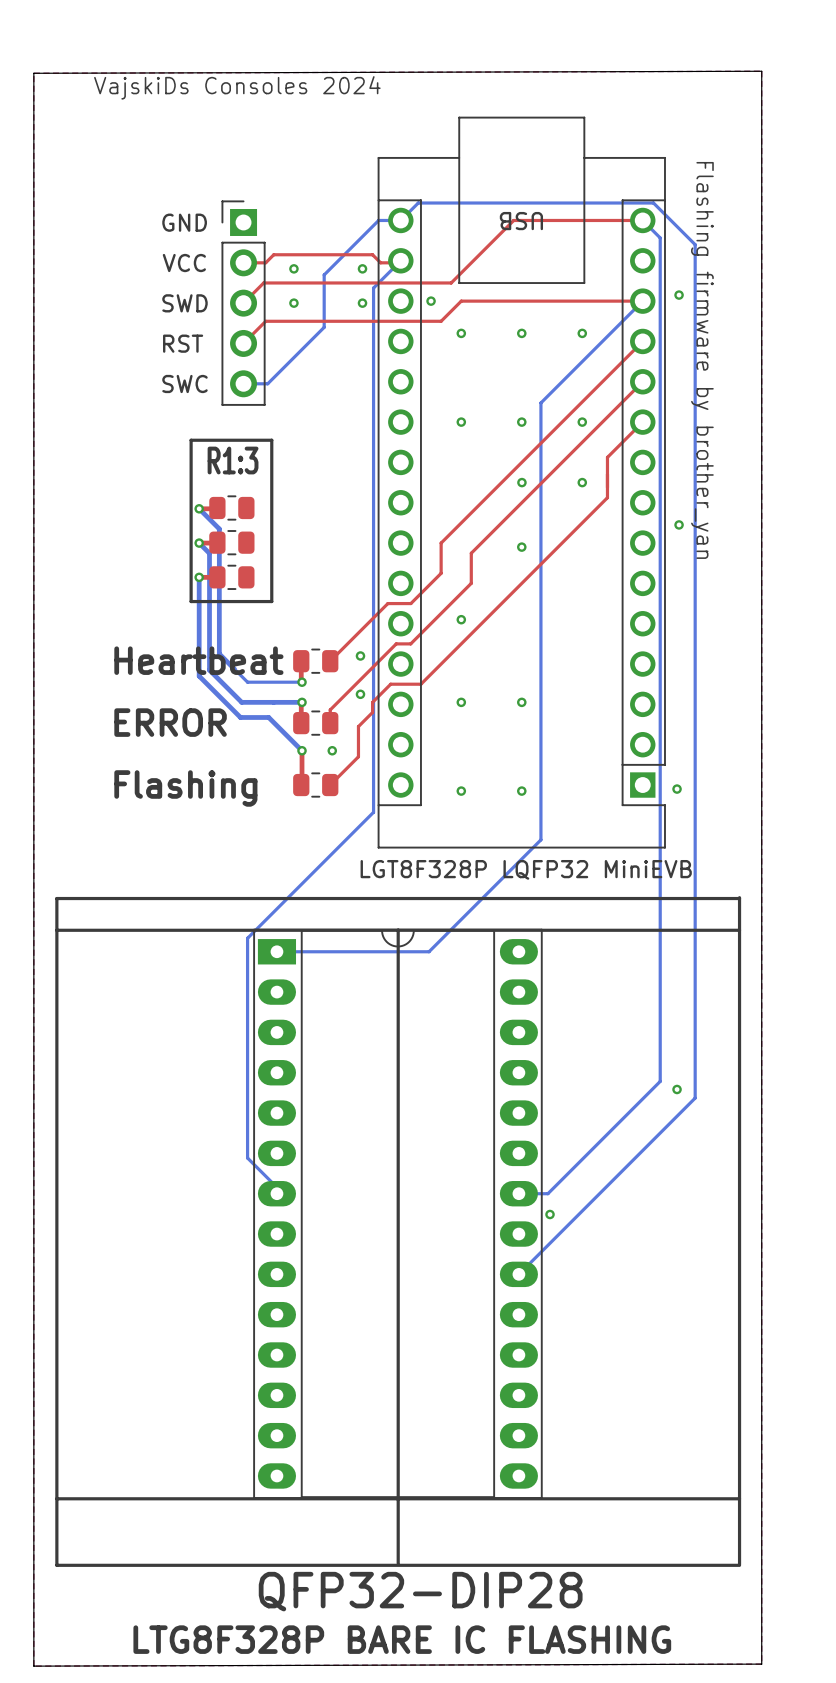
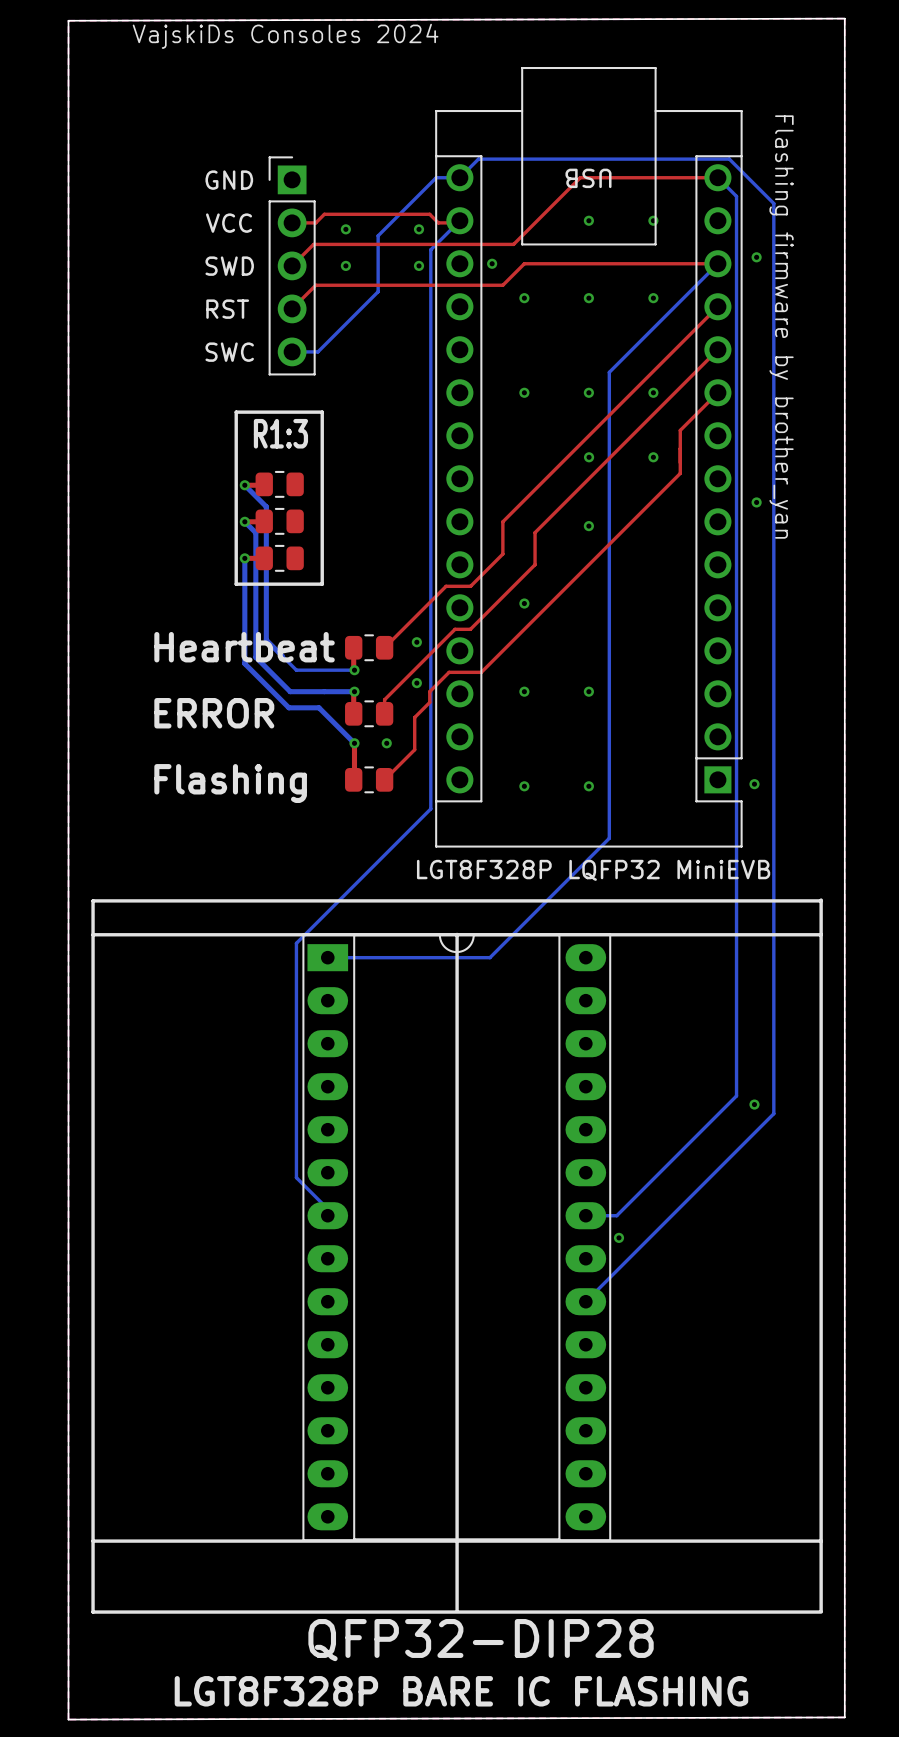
via: none -> (588, 220)
via: none -> (653, 220)
text: LTG8F328P BARE IC FLASHING (402, 1639) -> LGT8F328P BARE IC FLASHING (461, 1691)

